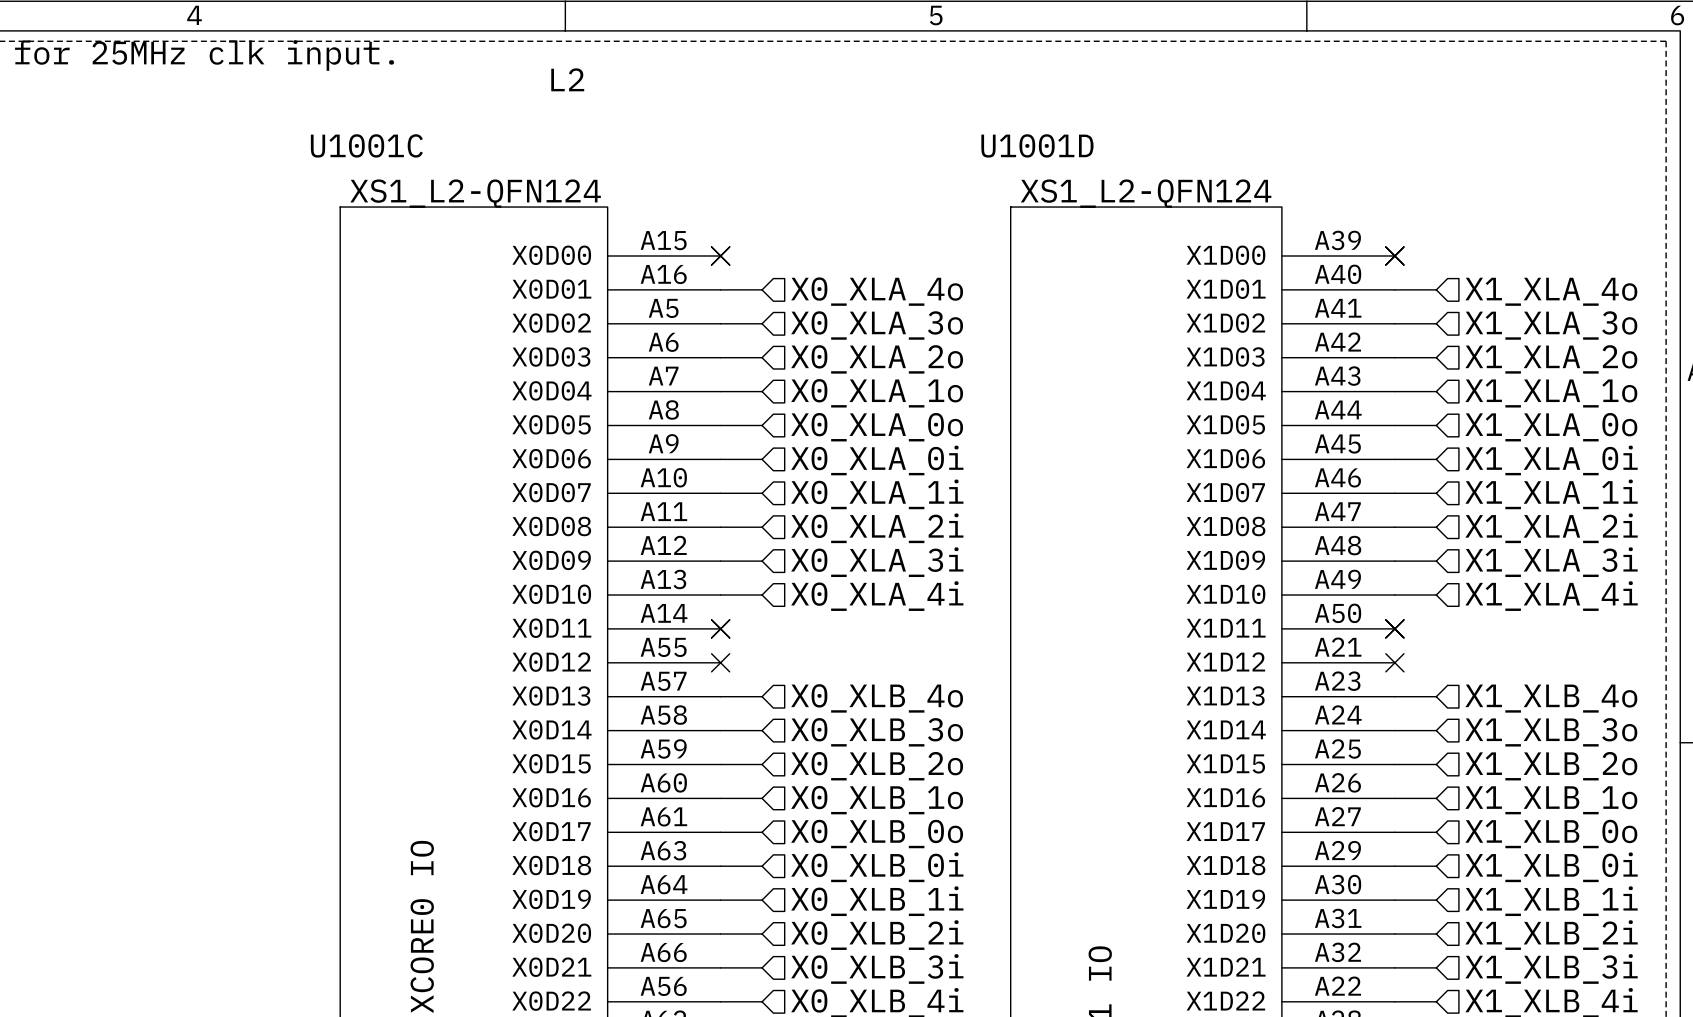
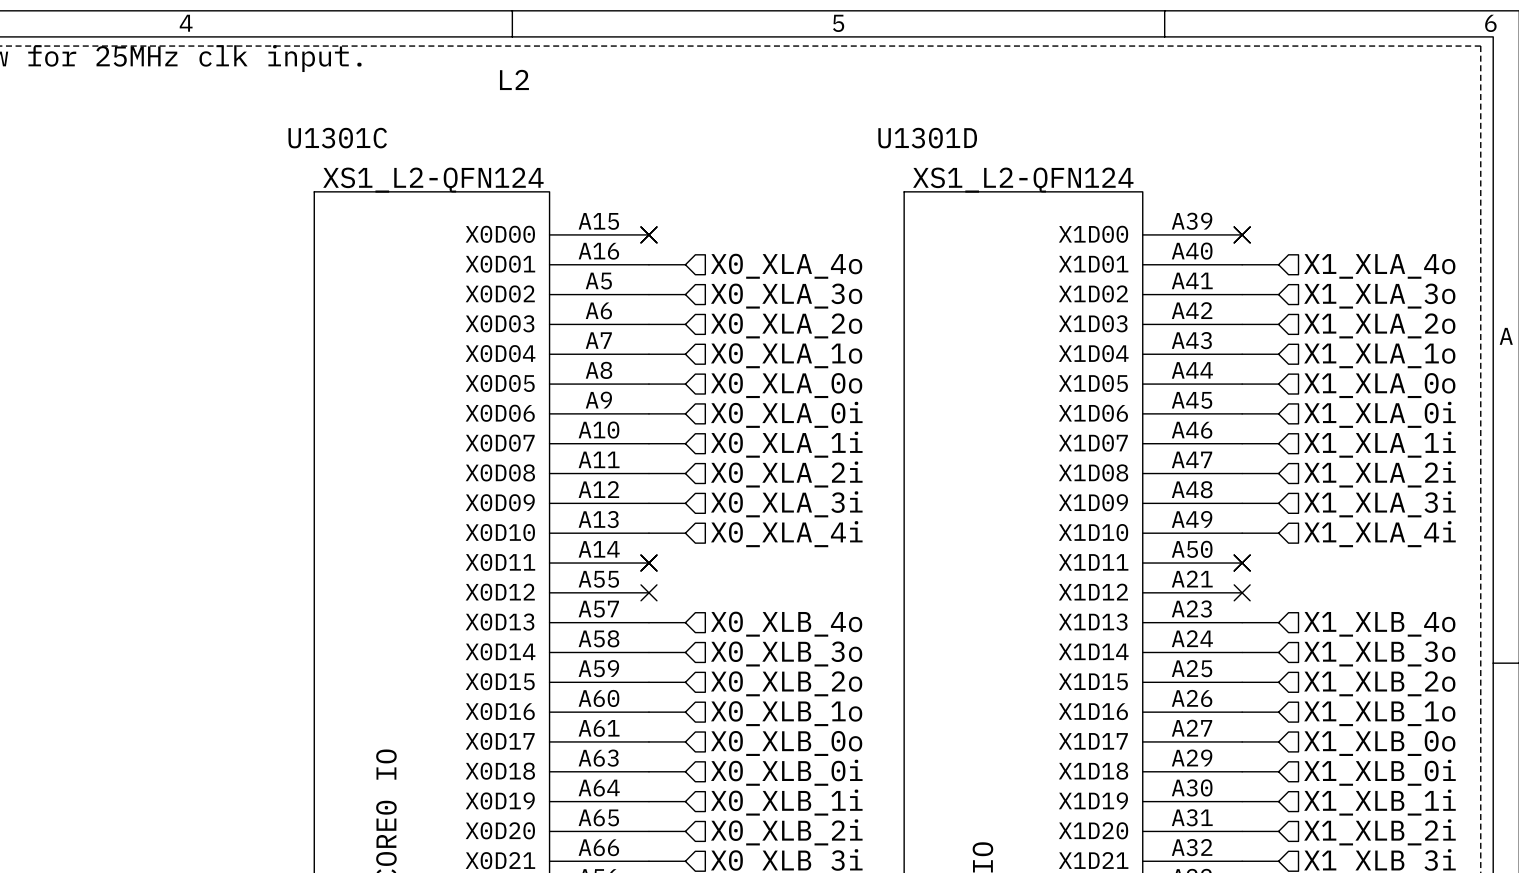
U1001C name: U1001C (366, 145) -> U1301C (337, 138)
U1001D name: U1001D (1037, 145) -> U1301D (927, 138)

